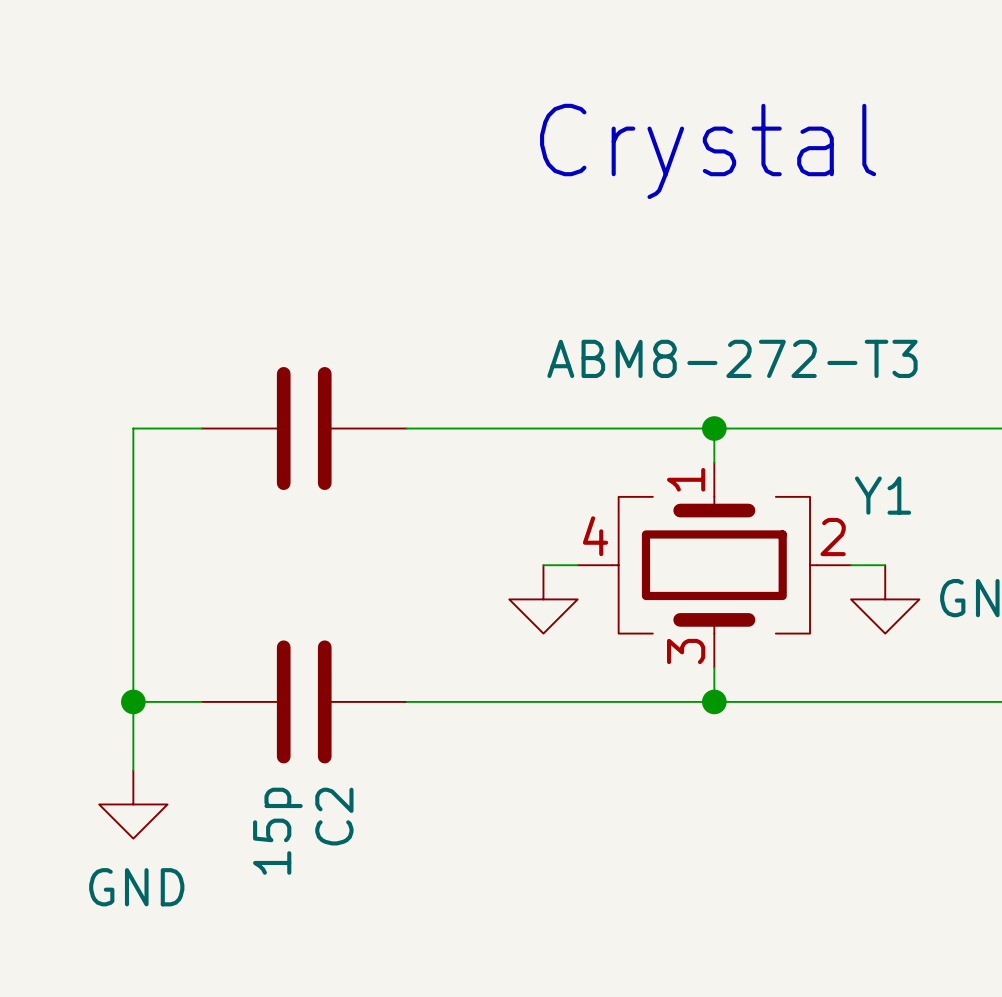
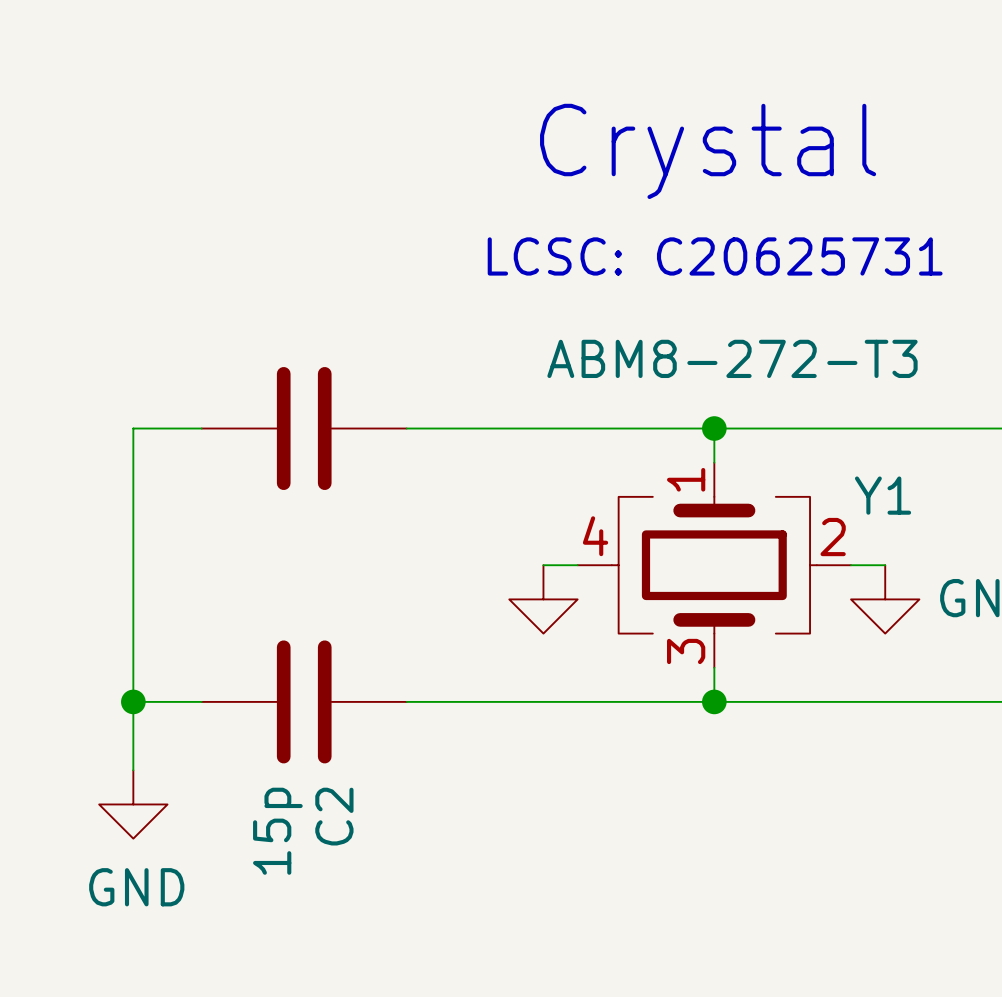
text: none -> LCSC: C20625731 (715, 256)

